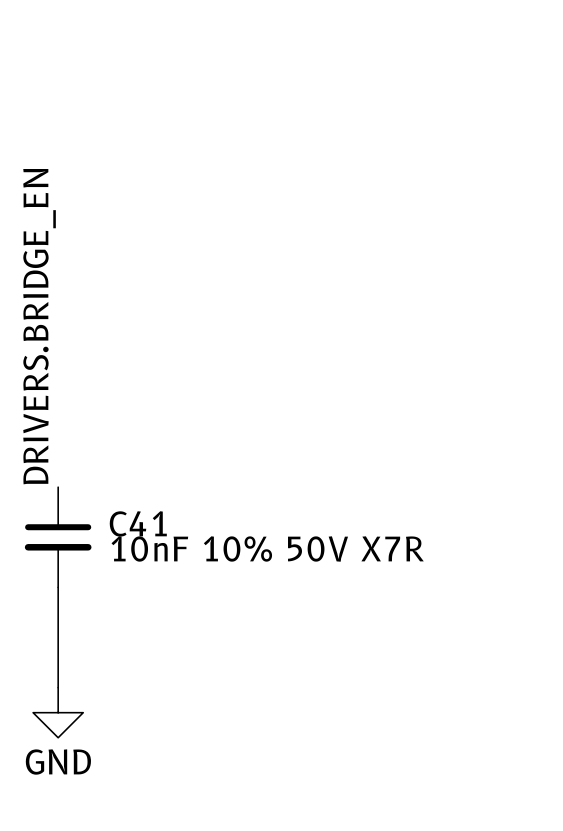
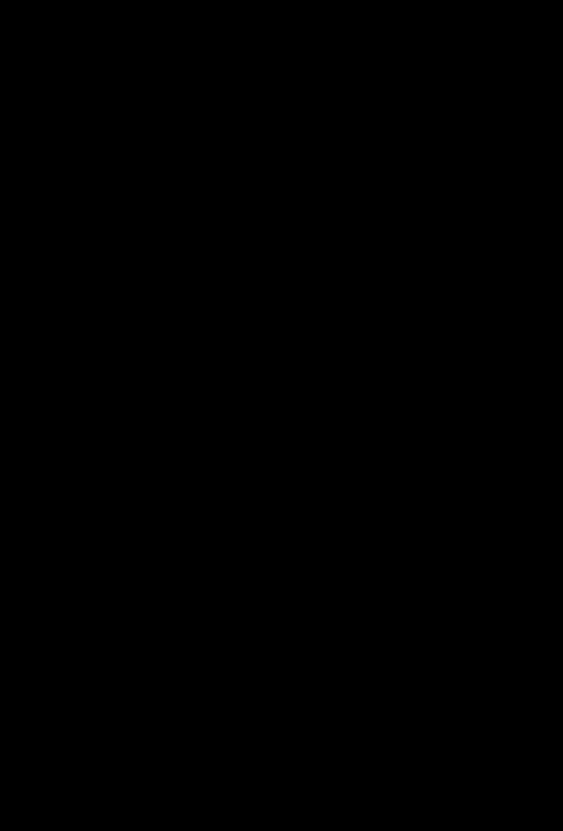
label: DRIVERS.BRIDGE_EN (39, 326) -> none
C41: 10nF 10% 50V X7R (58, 537) -> none
wire: (58, 587) (58, 687) -> none
power symbol: GND (58, 712) -> none

